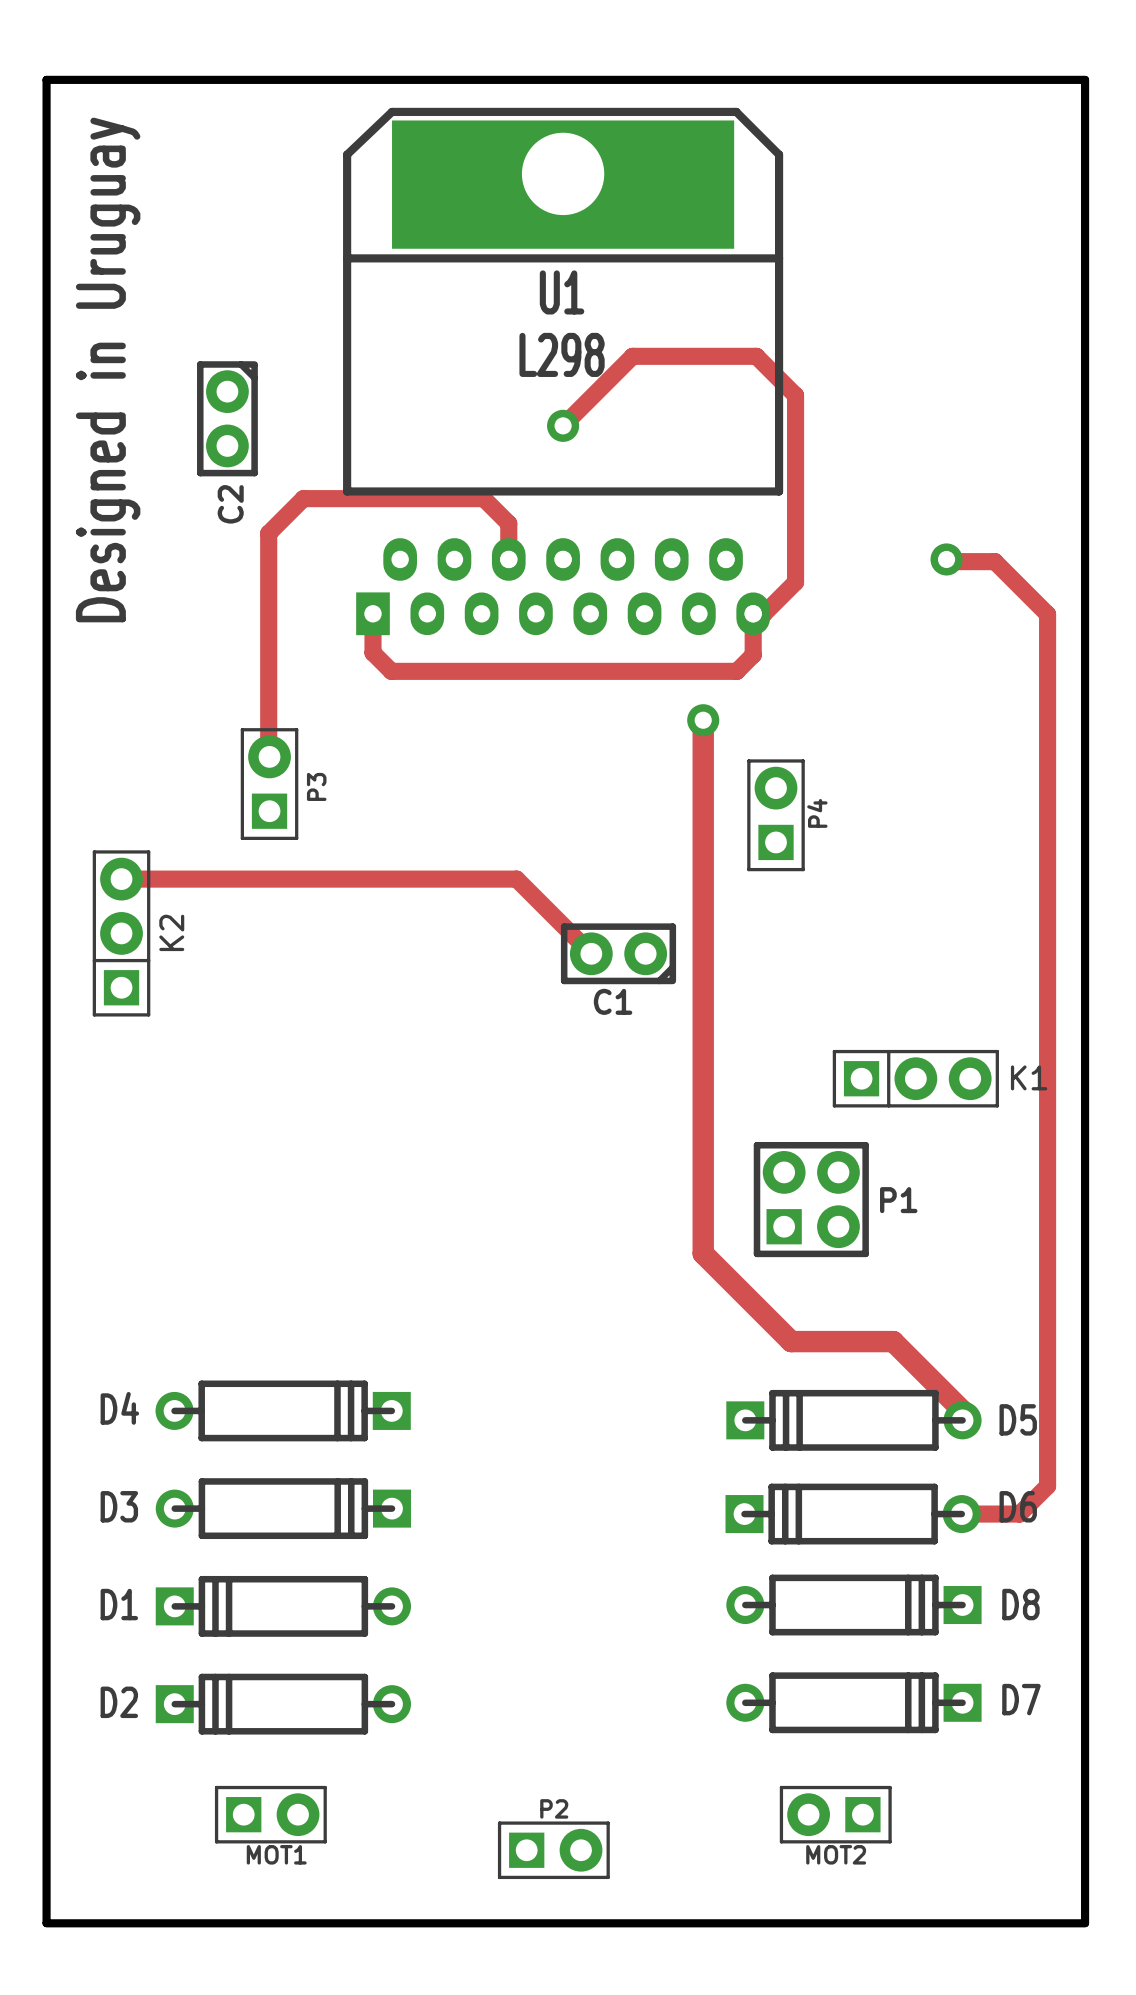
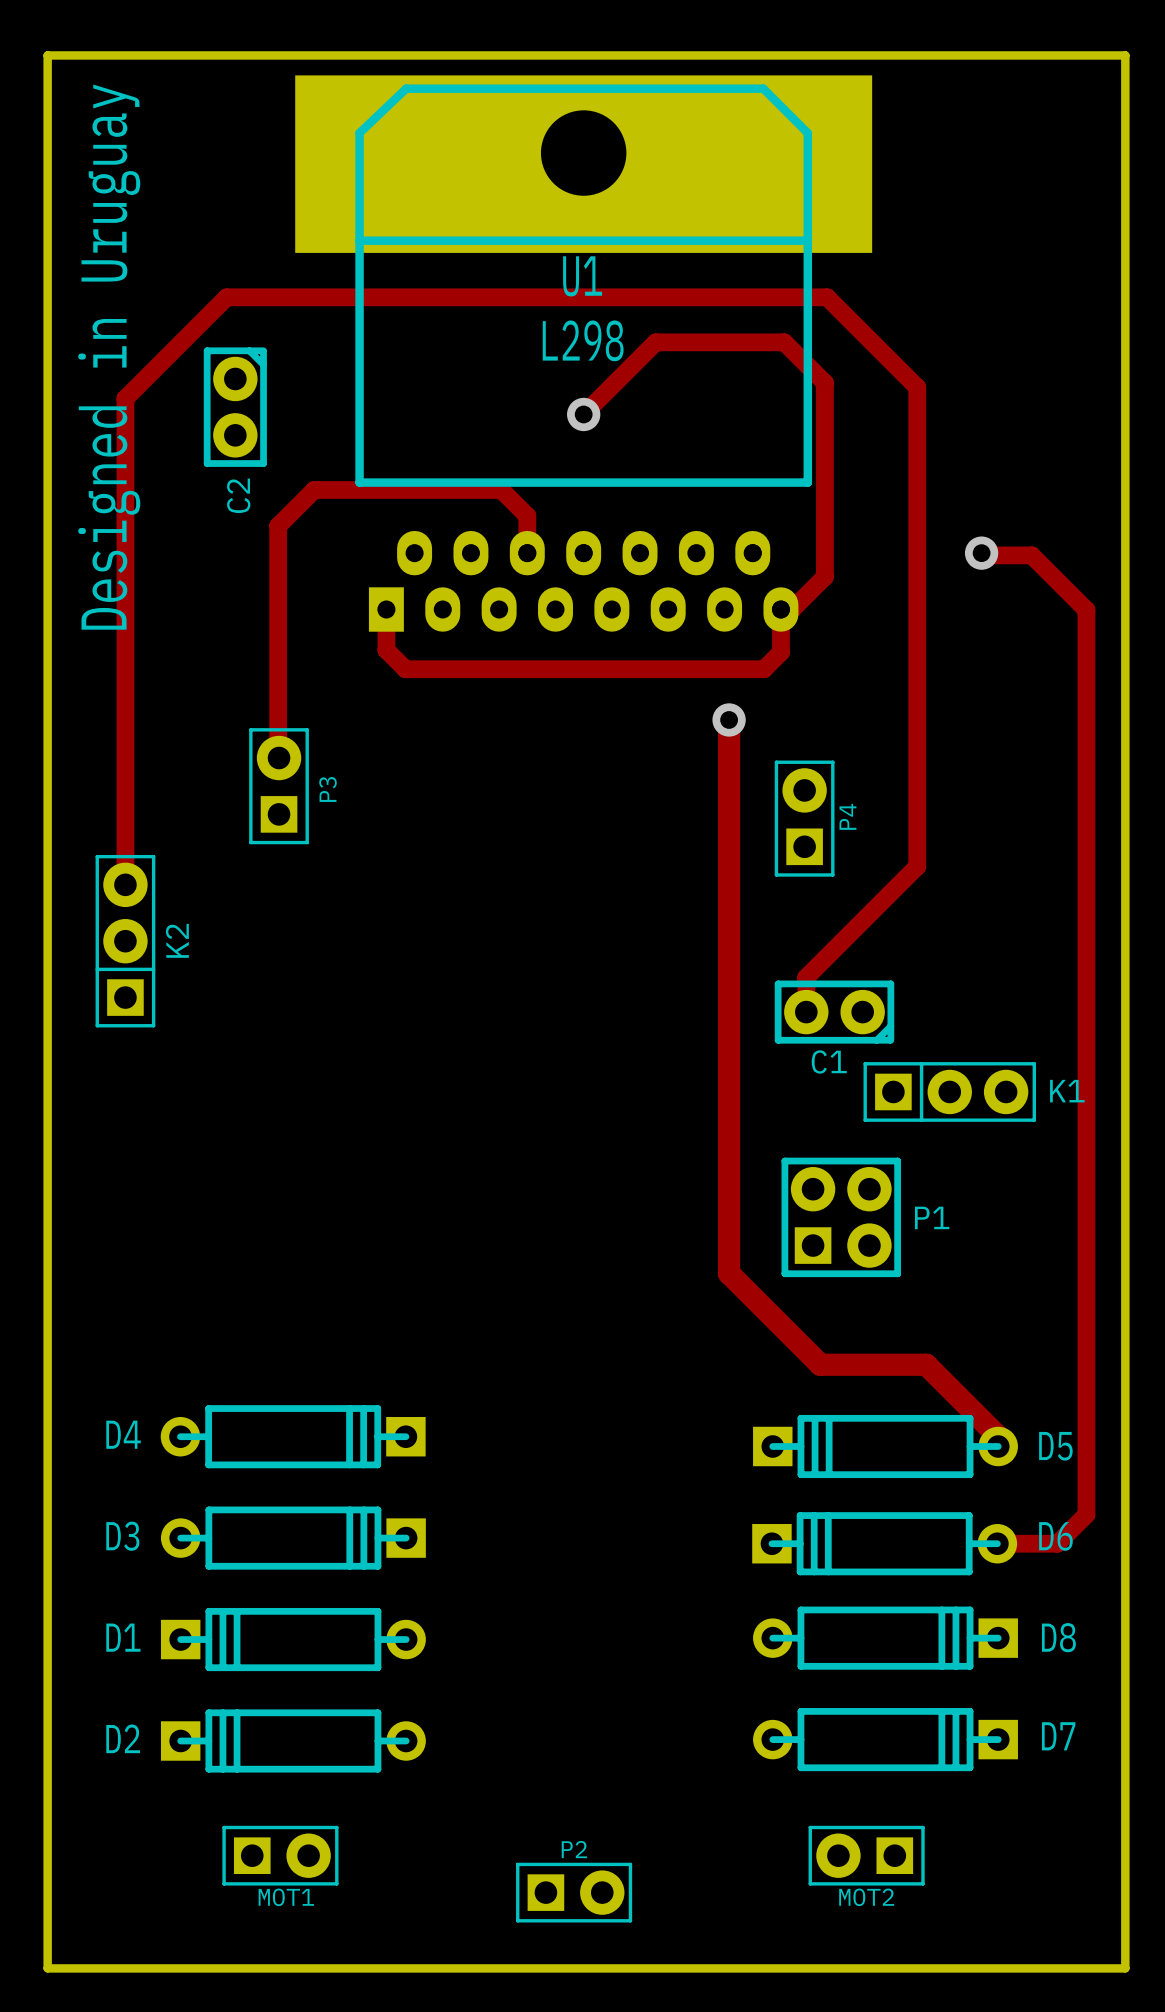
U1 footprint: [343, 107, 784, 636] -> [295, 75, 873, 632]
track: (121, 879) (516, 879) (591, 953) -> (125, 884) (125, 398) (226, 297) (827, 297) (917, 387) (917, 866) (806, 977) (806, 1012)
C1 position: (618, 953) -> (834, 1012)

